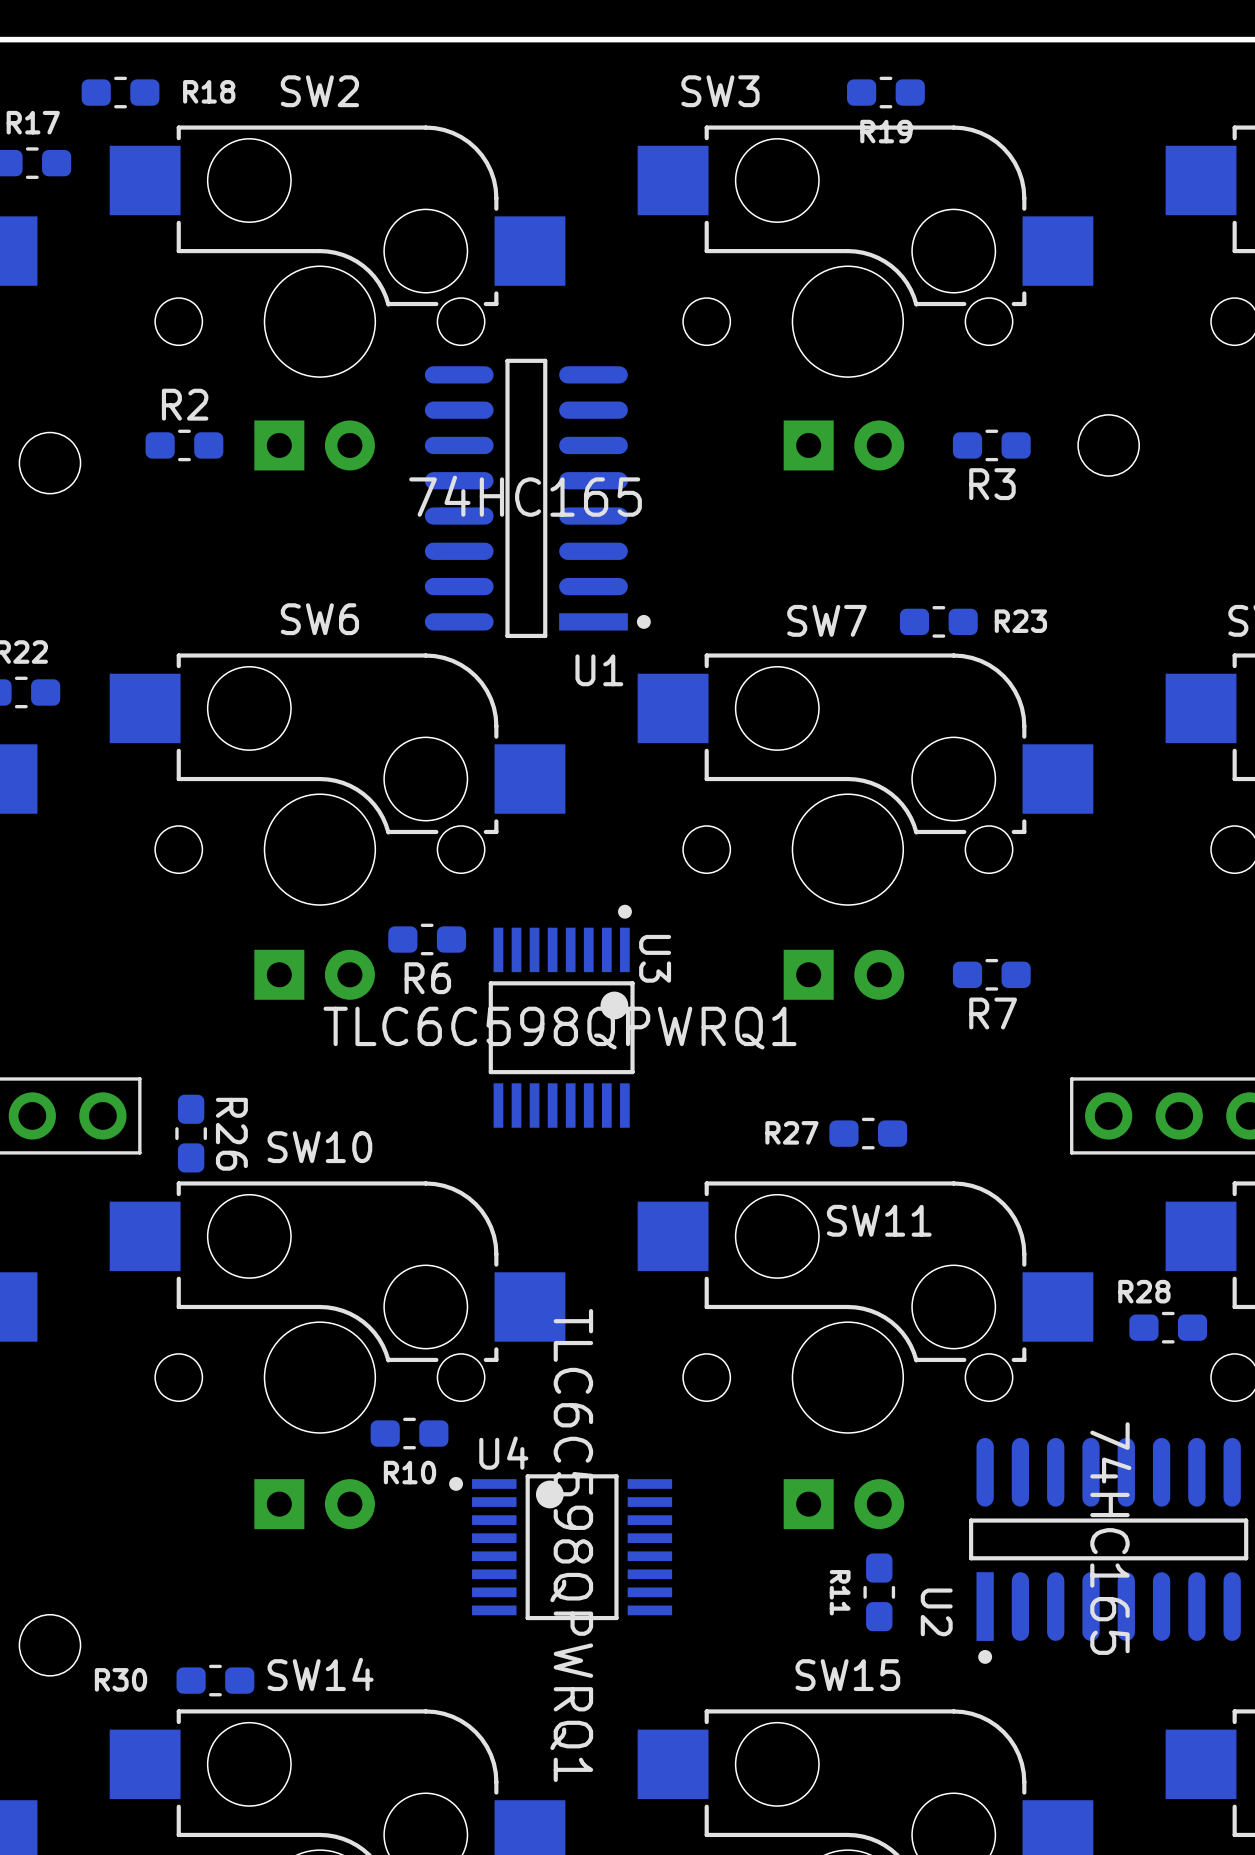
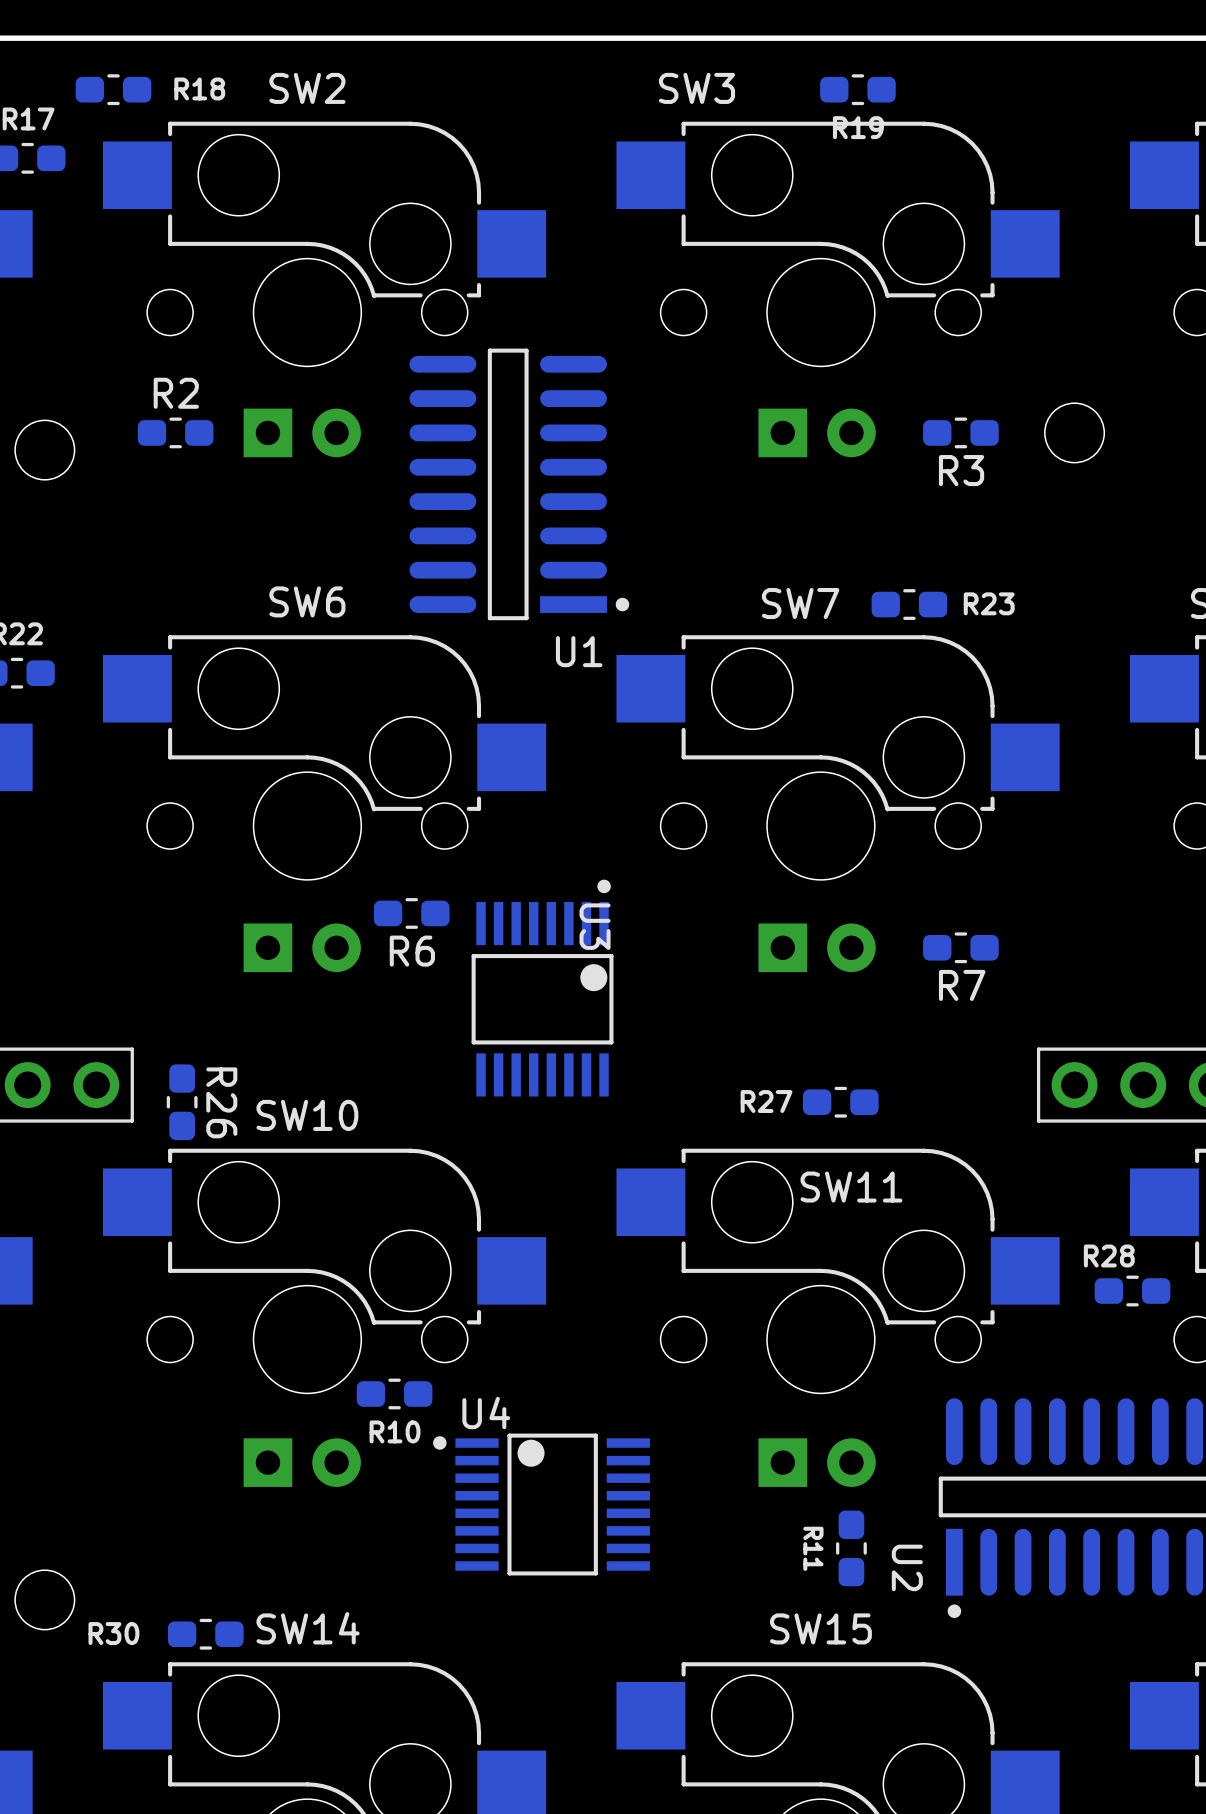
U1 value: 74HC165 (525, 496) -> none
U3 name position: U3 (655, 958) -> U3 (595, 926)
U3 value: TLC6C598QPWRQ1 (559, 1028) -> none
U2 value: 74HC165 (1110, 1538) -> none
U4 value: TLC6C598QPWRQ1 (571, 1545) -> none

